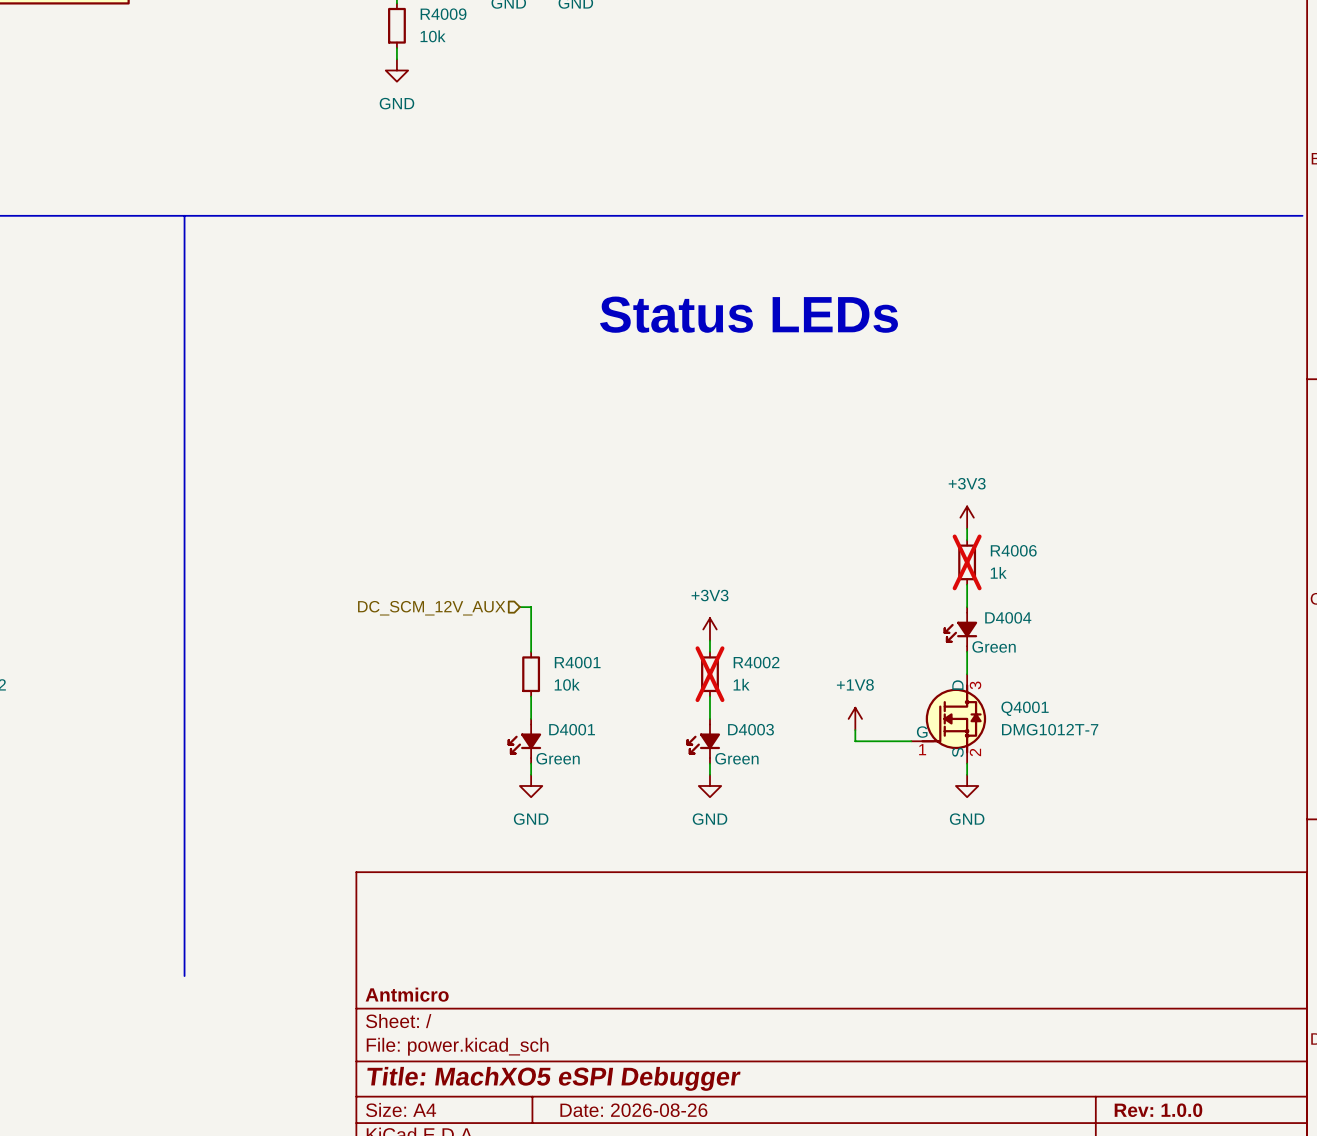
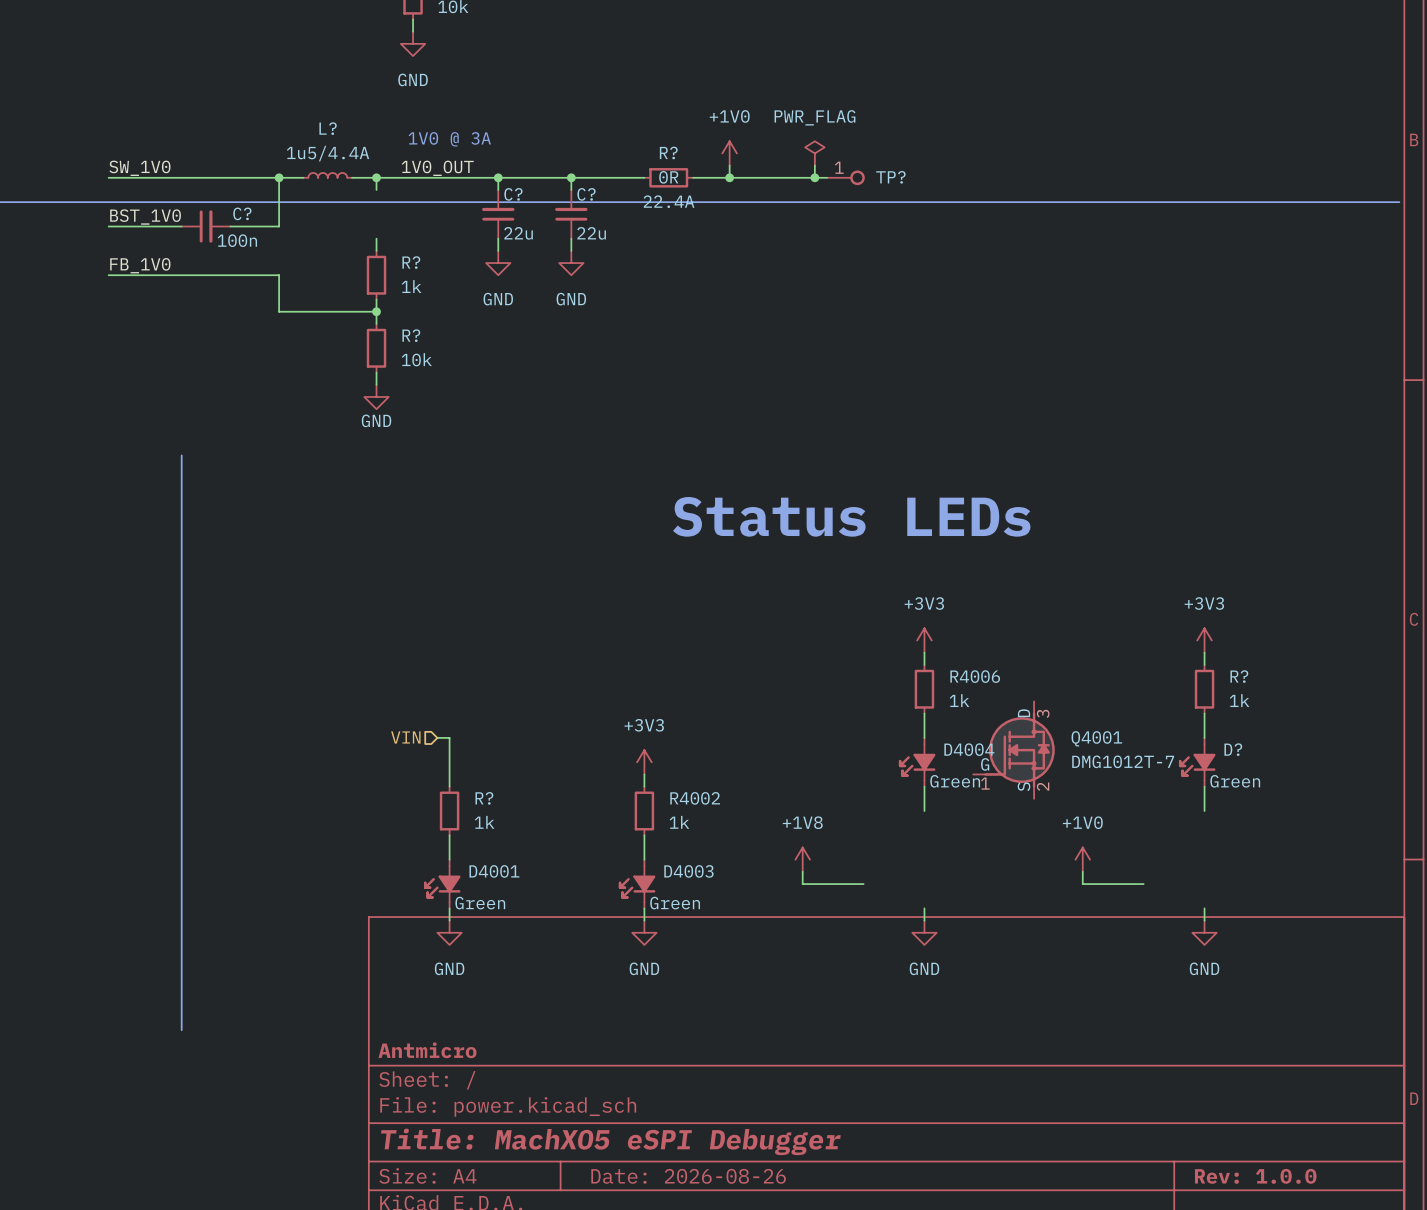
text: none -> 1V0 @ 3A (449, 139)
power symbol: none -> +1V0 (729, 153)
power symbol: none -> PWR_FLAG (814, 153)
wire: none -> (729, 165) (729, 177)
wire: none -> (814, 165) (814, 177)
label: none -> SW_1V0 (139, 168)
label: none -> 1V0_OUT (437, 168)
L?: none -> (327, 175)
wire: none -> (108, 177) (303, 177)
wire: none -> (279, 177) (279, 226) (230, 226)
junction: none -> (279, 177)
wire: none -> (352, 177) (644, 177)
wire: none -> (376, 177) (376, 189)
junction: none -> (376, 177)
wire: none -> (498, 177) (498, 189)
junction: none -> (498, 177)
wire: none -> (571, 177) (571, 189)
junction: none -> (571, 177)
R?: none -> (668, 177)
wire: none -> (693, 177) (827, 177)
junction: none -> (729, 177)
junction: none -> (814, 177)
TP?: none -> (845, 177)
line: (184, 215) (184, 448) -> none
C?: none -> (498, 214)
C?: none -> (571, 214)
label: none -> BST_1V0 (145, 217)
wire: none -> (108, 226) (181, 226)
C?: none -> (206, 226)
wire: none -> (376, 238) (376, 250)
wire: none -> (498, 238) (498, 250)
wire: none -> (571, 238) (571, 250)
power symbol: none -> GND (498, 263)
power symbol: none -> GND (571, 263)
label: none -> FB_1V0 (140, 265)
wire: none -> (108, 275) (279, 275) (279, 311) (376, 311)
R?: none -> (376, 275)
wire: none -> (376, 299) (376, 323)
text position: Status LEDs (749, 314) -> Status LEDs (851, 516)
junction: none -> (376, 311)
R?: none -> (376, 348)
wire: none -> (376, 372) (376, 384)
power symbol: none -> GND (376, 396)
power symbol: +3V3 (967, 517) -> none
wire: (967, 528) (967, 540) -> (924, 652) (924, 664)
R4006 position: (967, 562) -> (924, 689)
R4006 do-not-place cross: (967, 562) -> none
wire: (967, 584) (967, 607) -> (924, 713) (924, 737)
wire: (519, 607) (531, 607) (531, 651) -> (437, 737) (449, 737) (449, 786)
hierarchical label: DC_SCM_12V_AUX (431, 608) -> none
power symbol: none -> +3V3 (924, 640)
power symbol: none -> +3V3 (1204, 640)
power symbol: +3V3 (709, 629) -> none
D4004 position: (960, 629) -> (917, 762)
wire: none -> (1204, 652) (1204, 664)
wire: (709, 640) (709, 651) -> (644, 774) (644, 786)
wire: (967, 651) (967, 674) -> (924, 786) (924, 810)
R?: none -> (1204, 689)
R4001: (531, 674) -> none
R4002 position: (709, 674) -> (644, 810)
R4002 do-not-place cross: (709, 674) -> none
wire: none -> (1204, 713) (1204, 737)
wire: (531, 696) (531, 718) -> (449, 835) (449, 859)
wire: (709, 696) (709, 718) -> (644, 835) (644, 859)
hierarchical label: none -> VIN (405, 737)
power symbol position: +1V8 (855, 718) -> +1V8 (802, 859)
power symbol: none -> +3V3 (644, 762)
wire: (855, 730) (855, 741) (911, 741) -> (802, 871) (802, 884) (863, 884)
D?: none -> (1197, 762)
D4001 position: (524, 741) -> (442, 884)
D4003 position: (703, 741) -> (637, 884)
wire: none -> (1204, 786) (1204, 810)
wire: (531, 763) (531, 774) -> (449, 908) (449, 920)
wire: (709, 763) (709, 774) -> (644, 908) (644, 920)
wire: (967, 763) (967, 774) -> (924, 908) (924, 920)
R?: none -> (449, 810)
power symbol: GND (531, 785) -> none
power symbol: GND (709, 785) -> none
power symbol: GND (967, 785) -> none
power symbol: none -> +1V0 (1082, 859)
wire: none -> (1082, 871) (1082, 884) (1143, 884)
wire: none -> (1204, 908) (1204, 920)
power symbol: none -> GND (449, 932)
power symbol: none -> GND (644, 932)
power symbol: none -> GND (924, 932)
power symbol: none -> GND (1204, 932)

